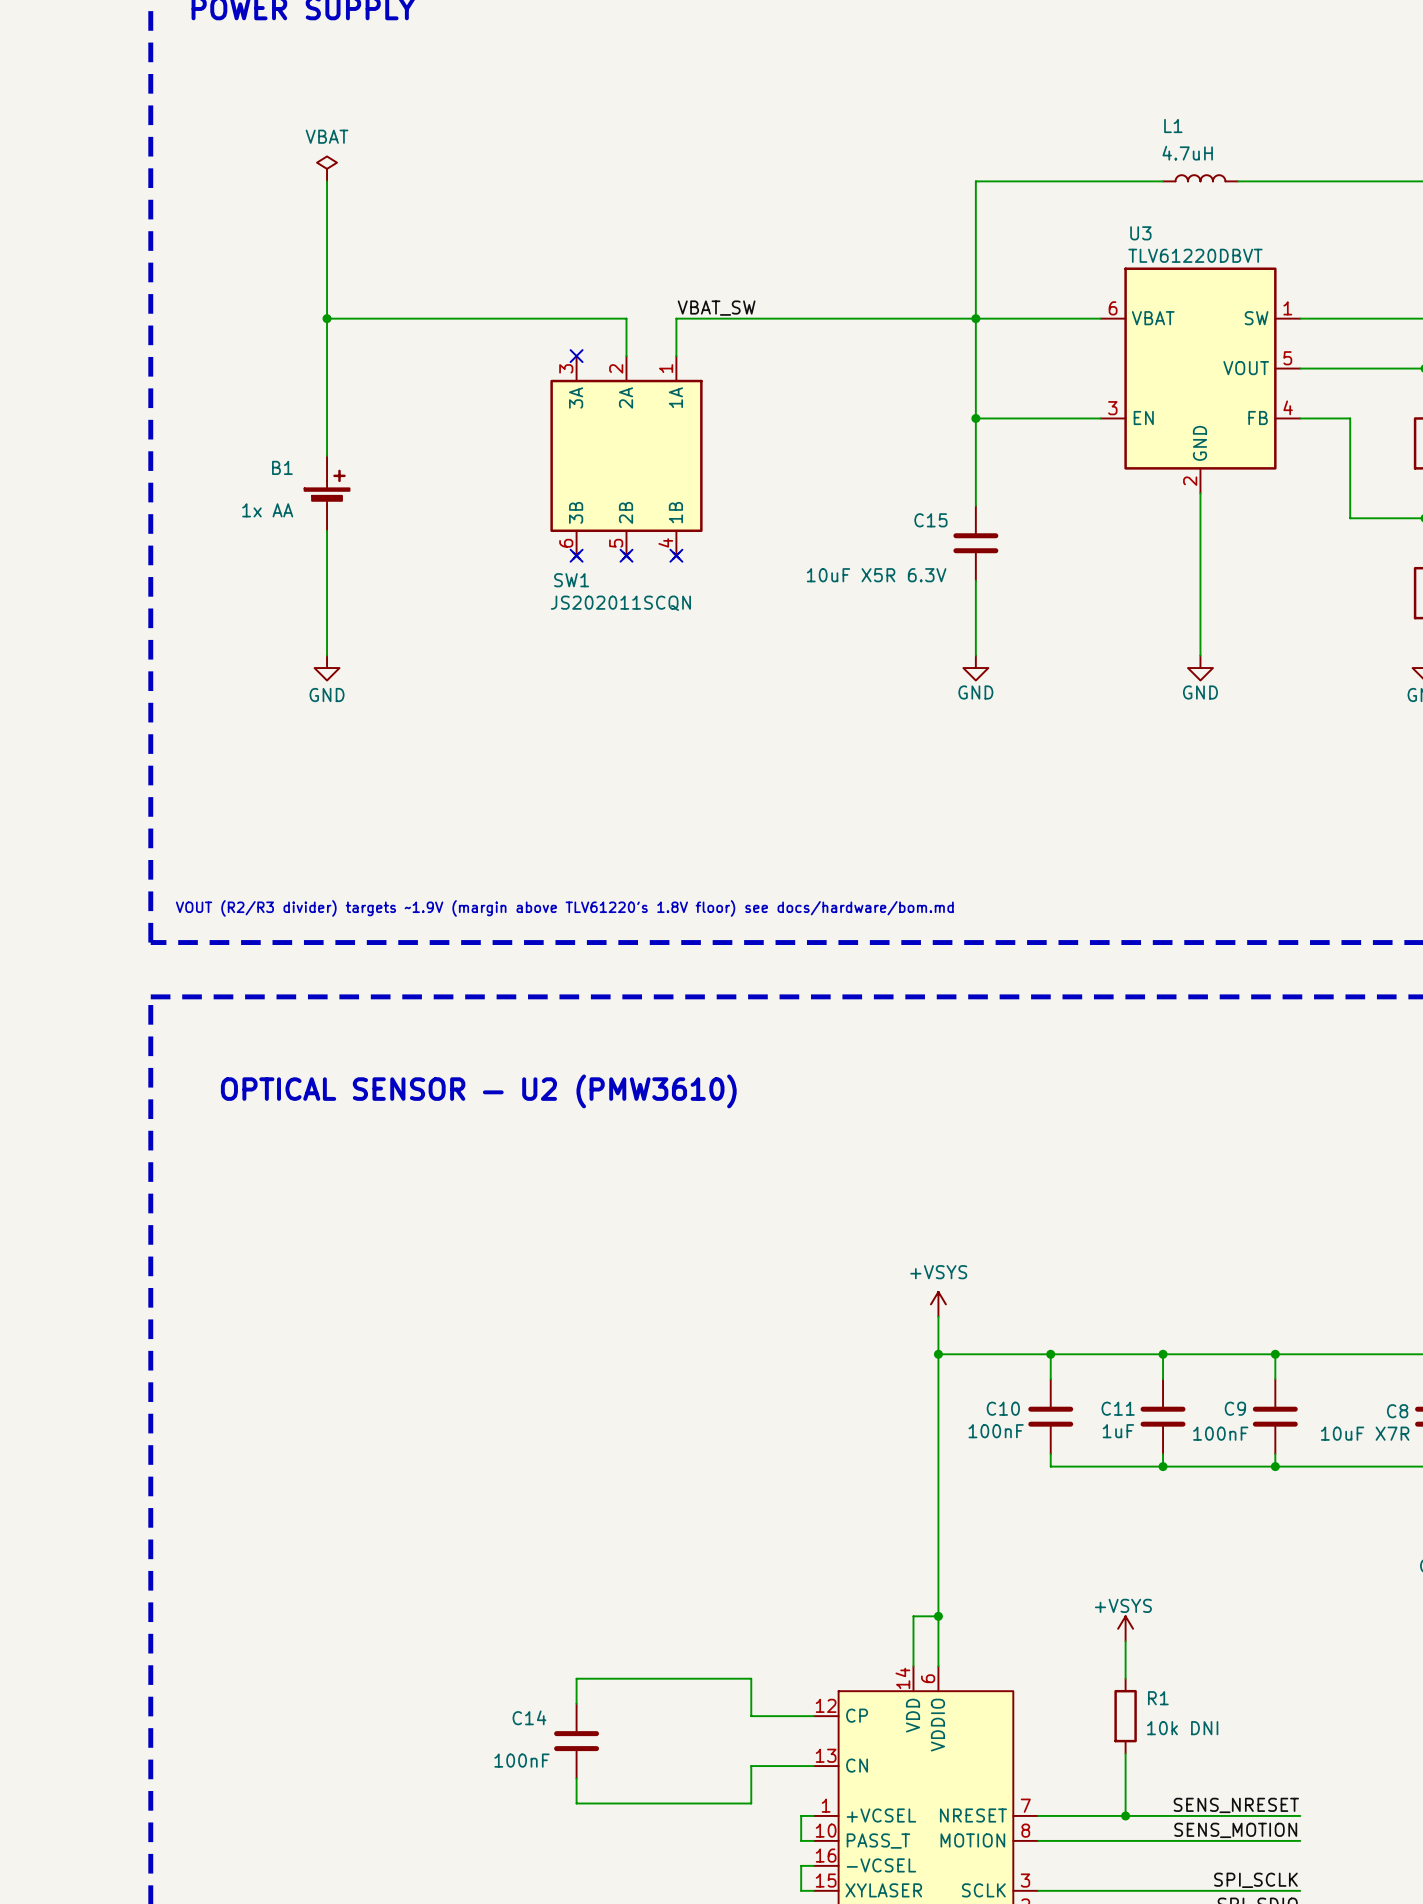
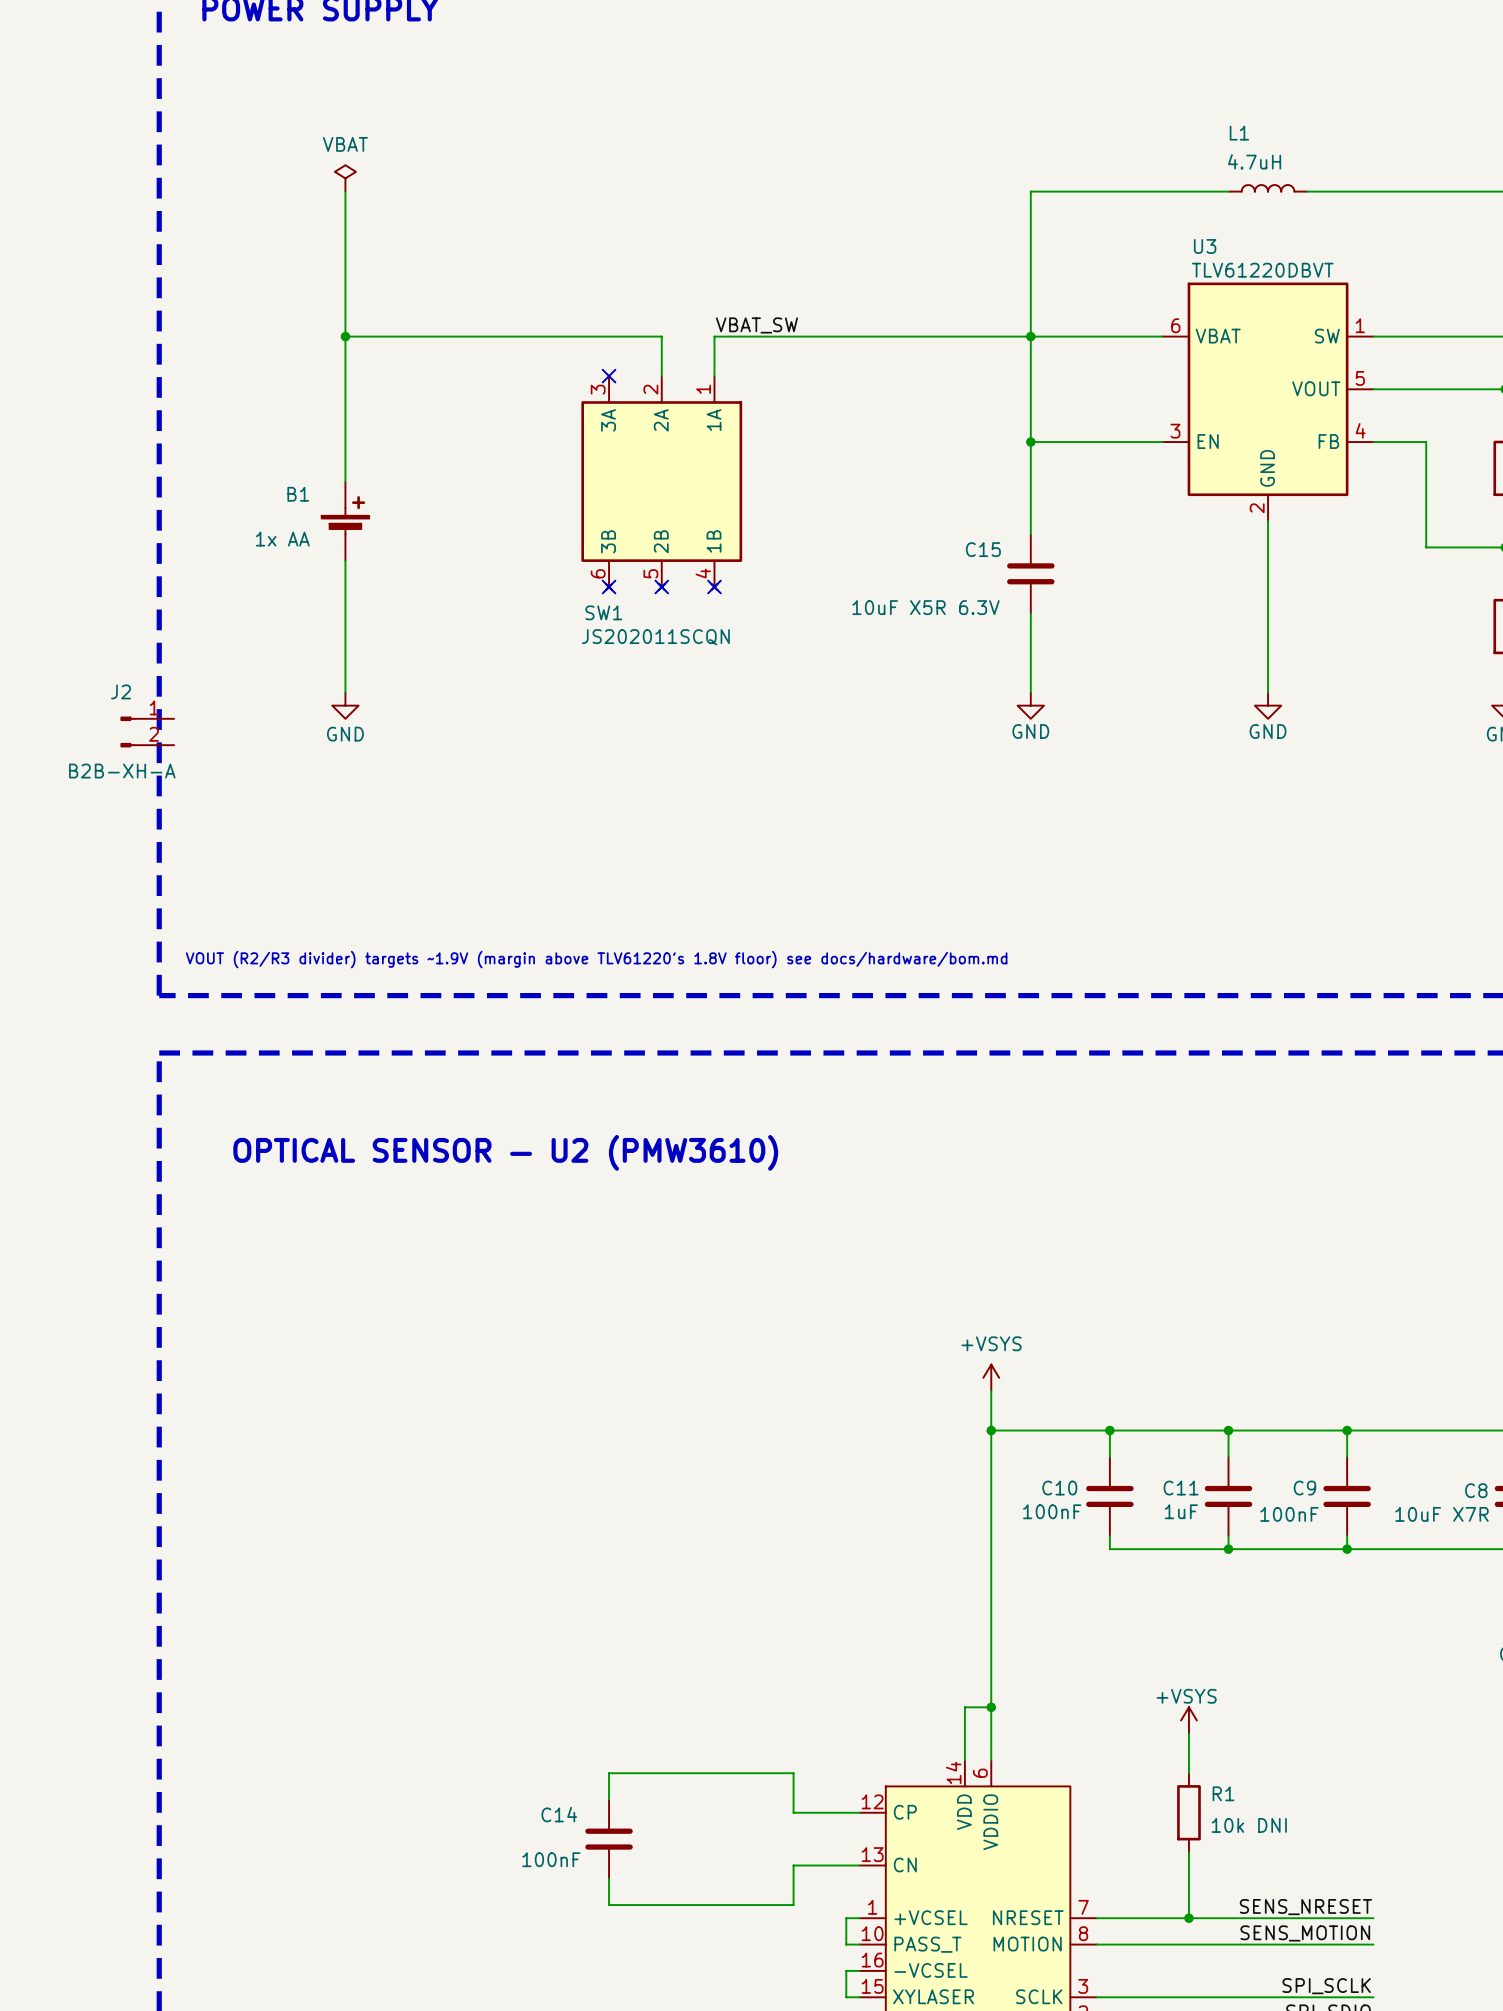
J2: none -> B2B-XH-A (147, 731)

